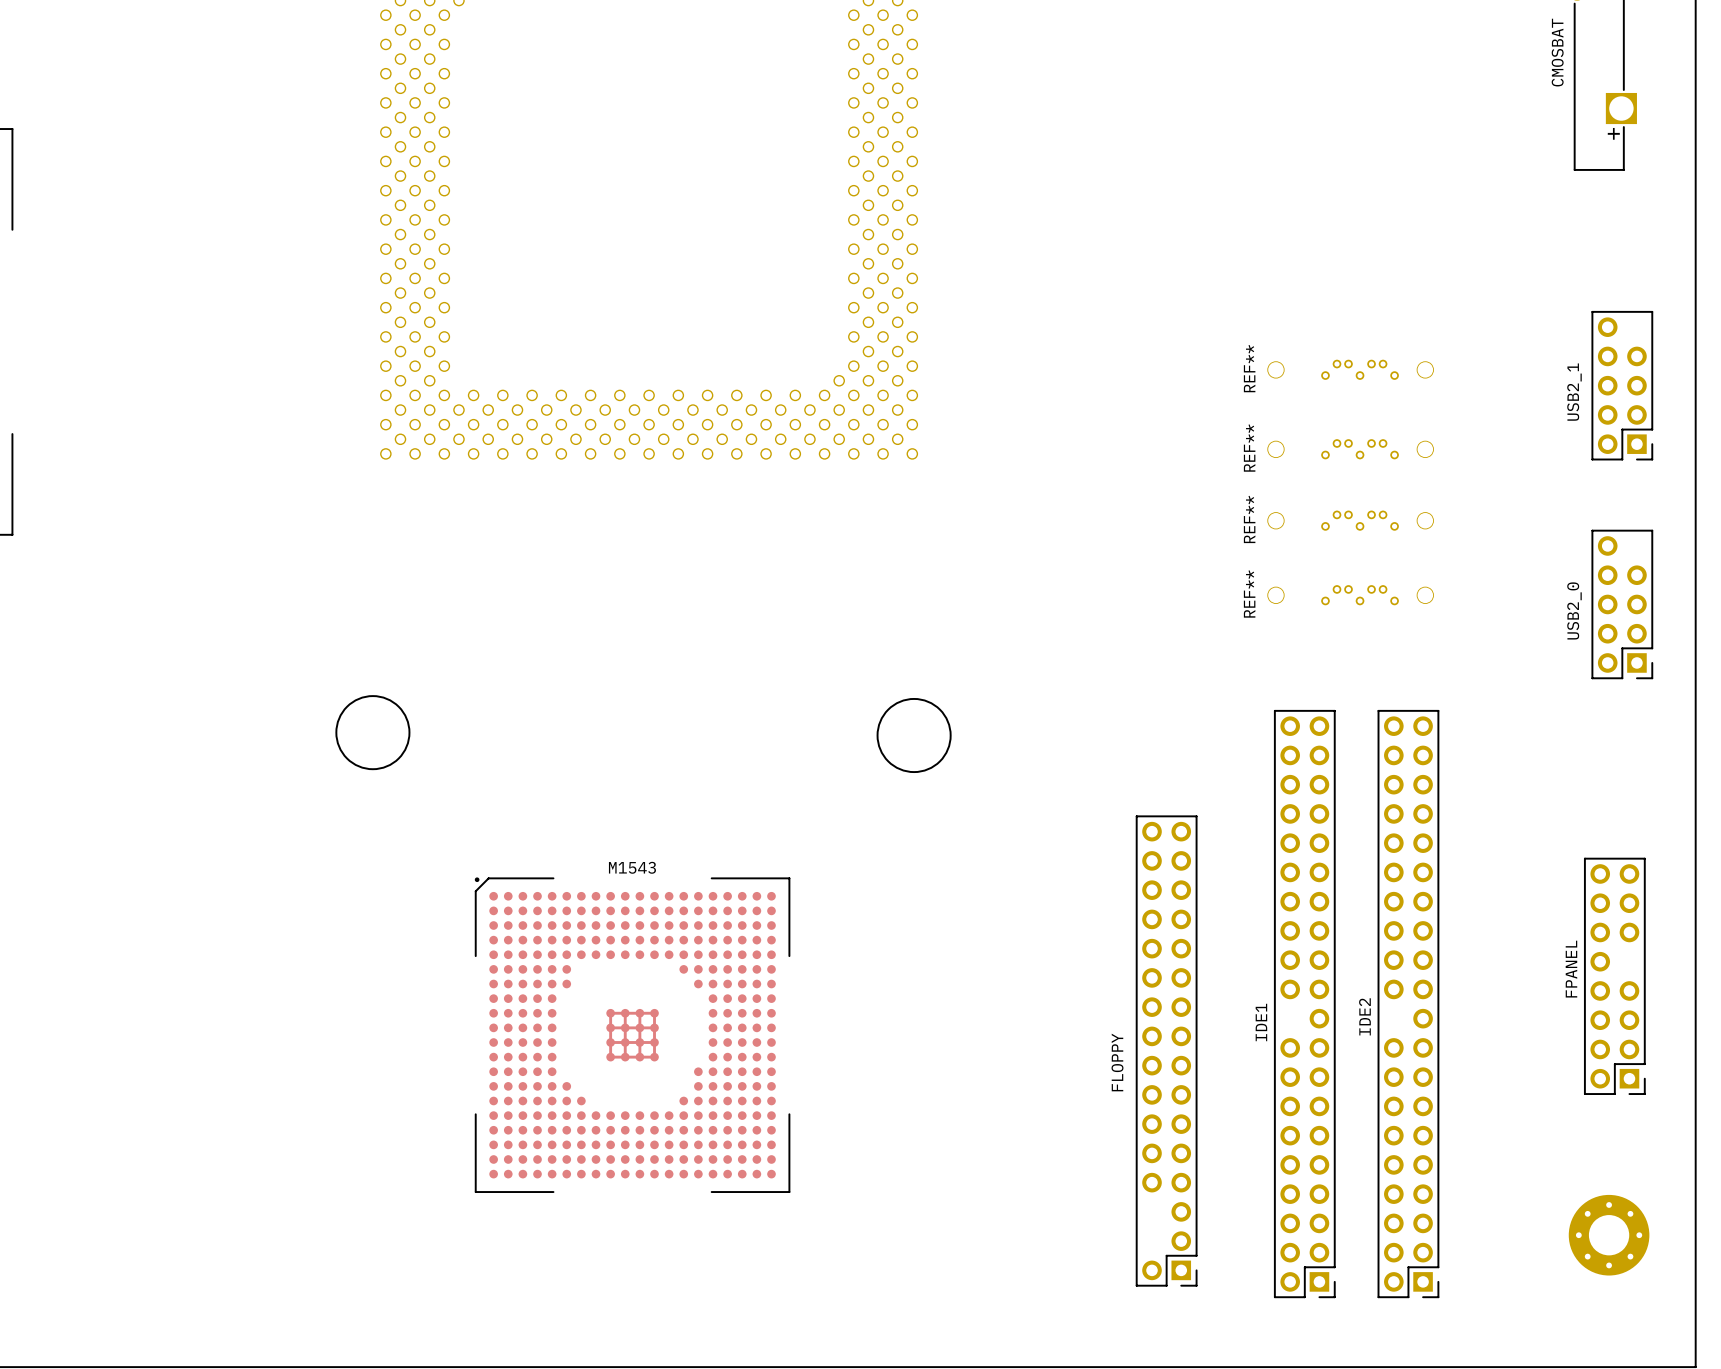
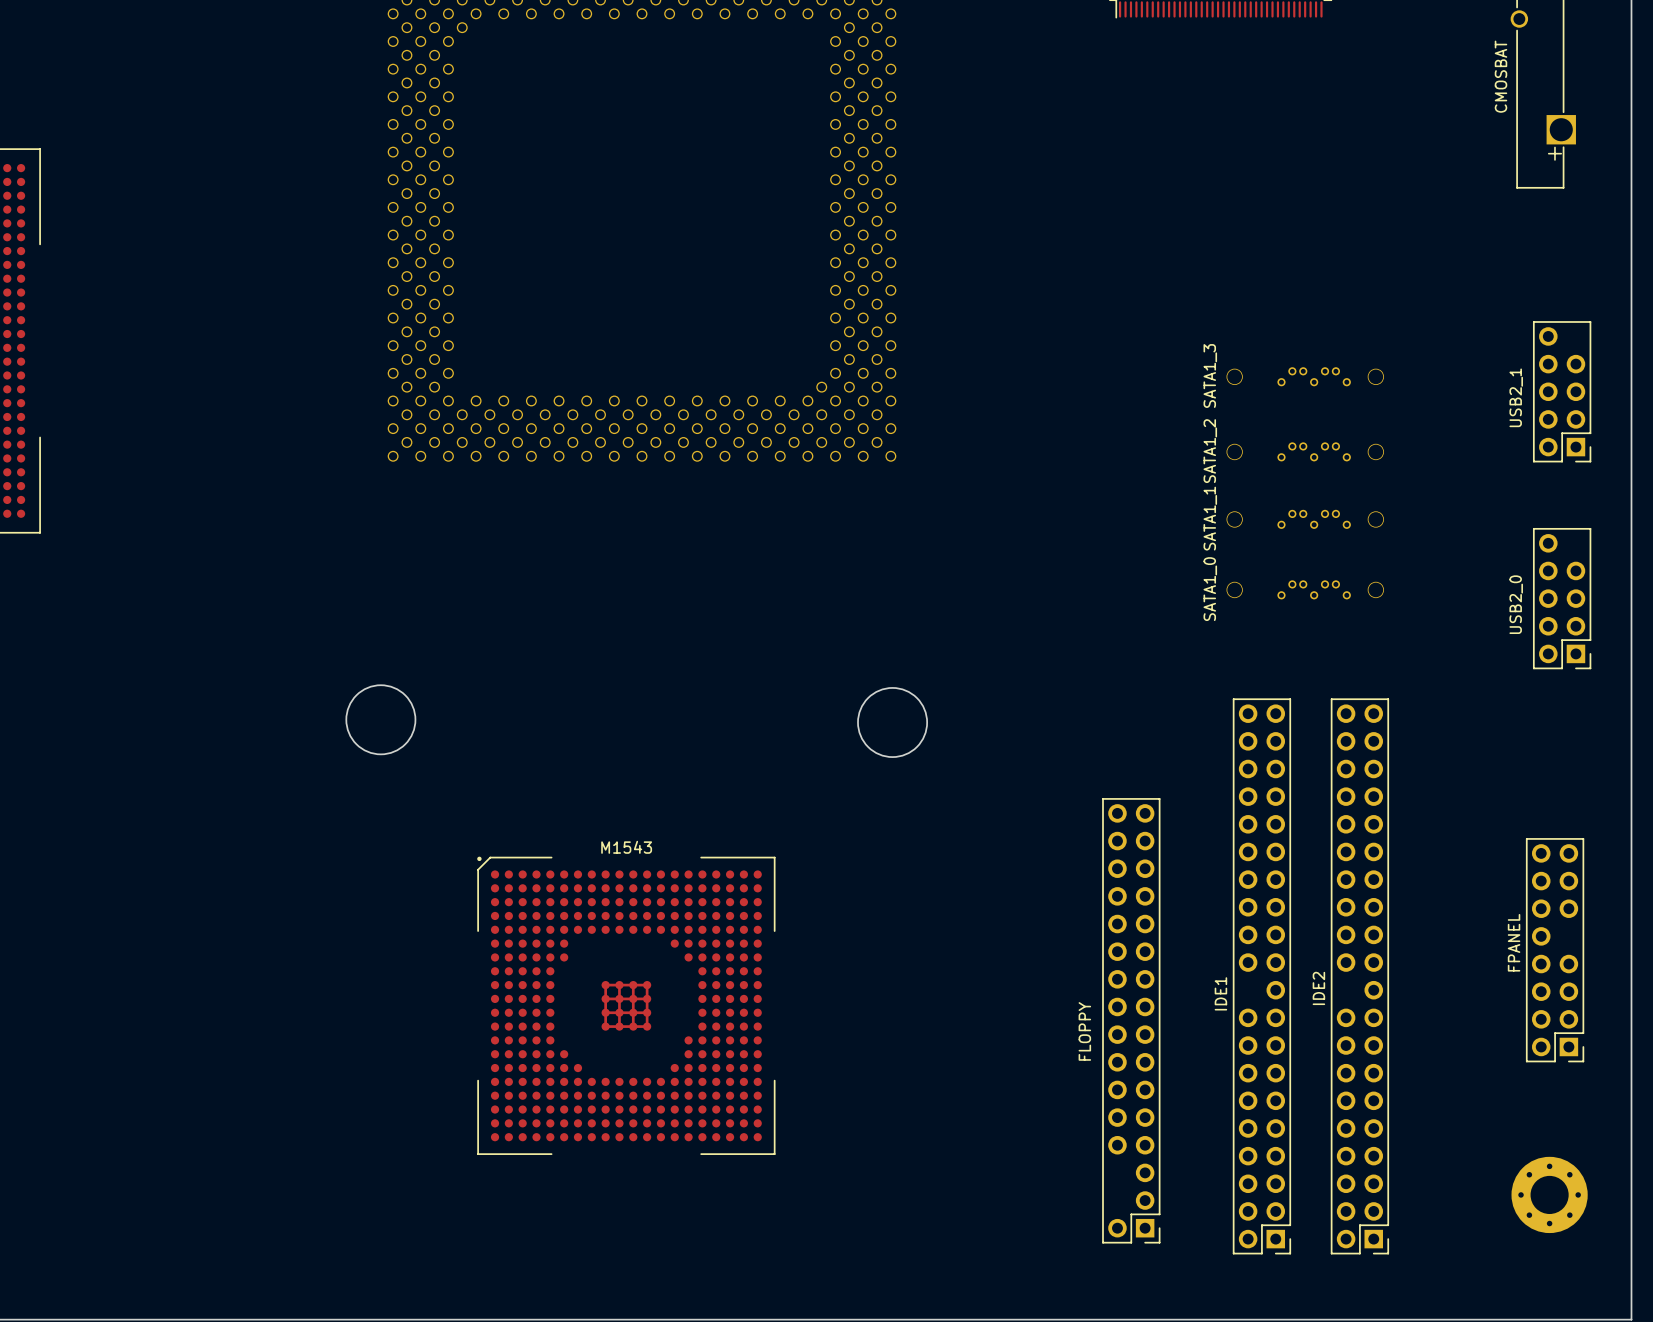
REF** name: REF** (1249, 368) -> SATA1_3 (1210, 375)
REF** name: REF** (1249, 448) -> SATA1_2 (1210, 451)
REF** name: REF** (1249, 519) -> SATA1_1 (1210, 518)
REF** name: REF** (1249, 594) -> SATA1_0 (1210, 589)

